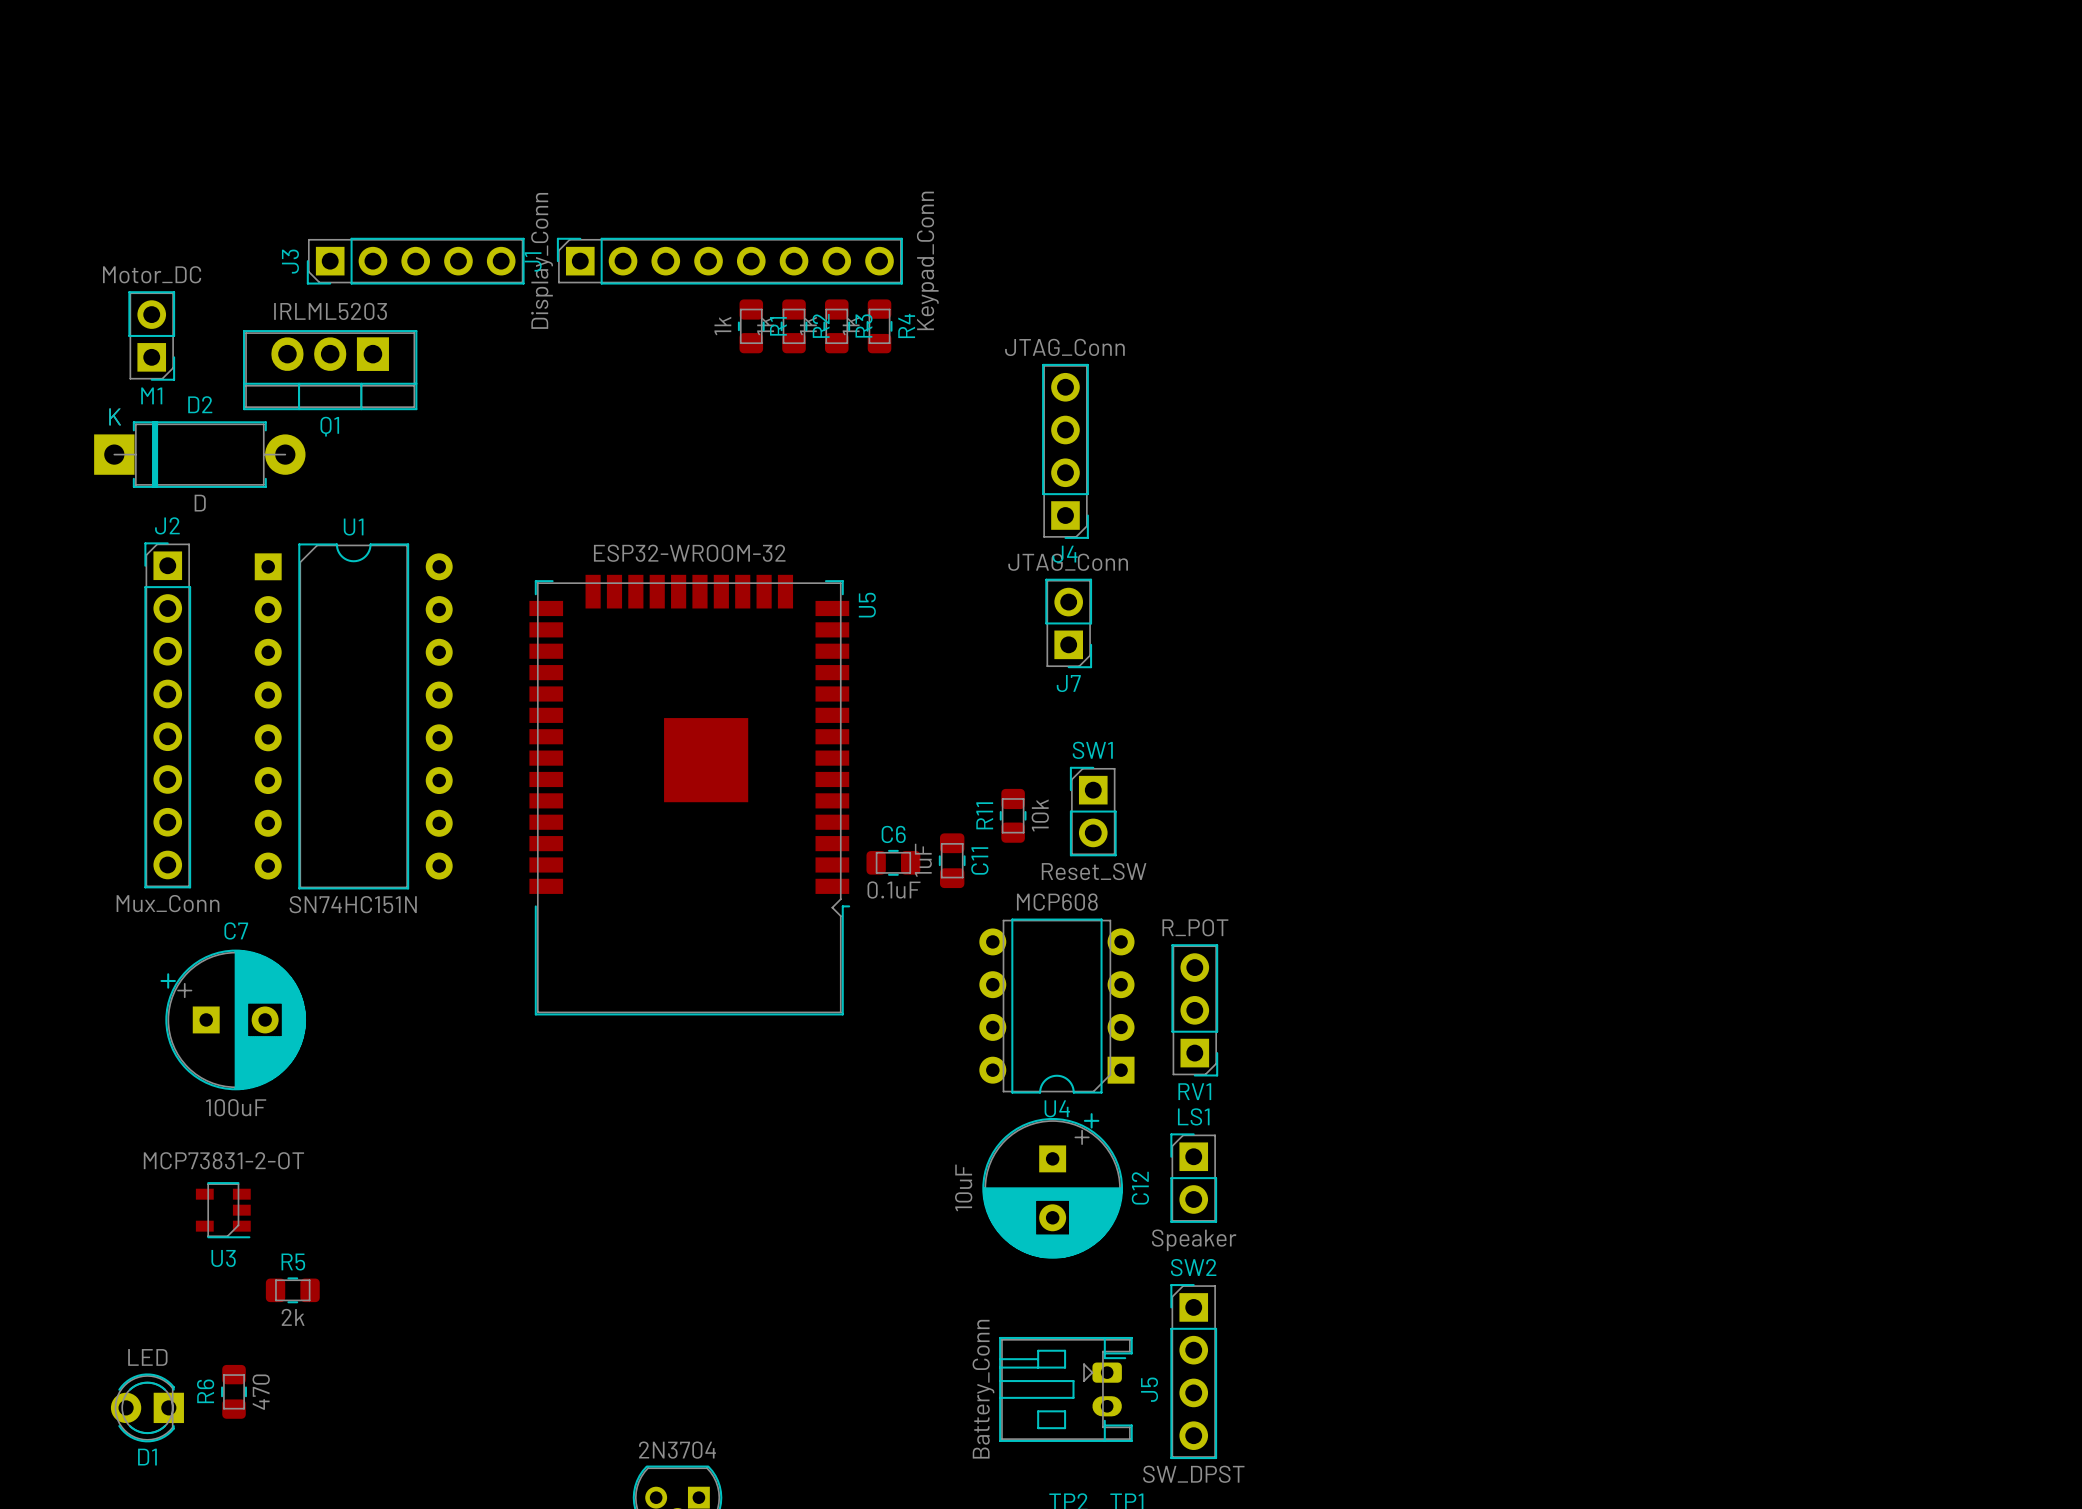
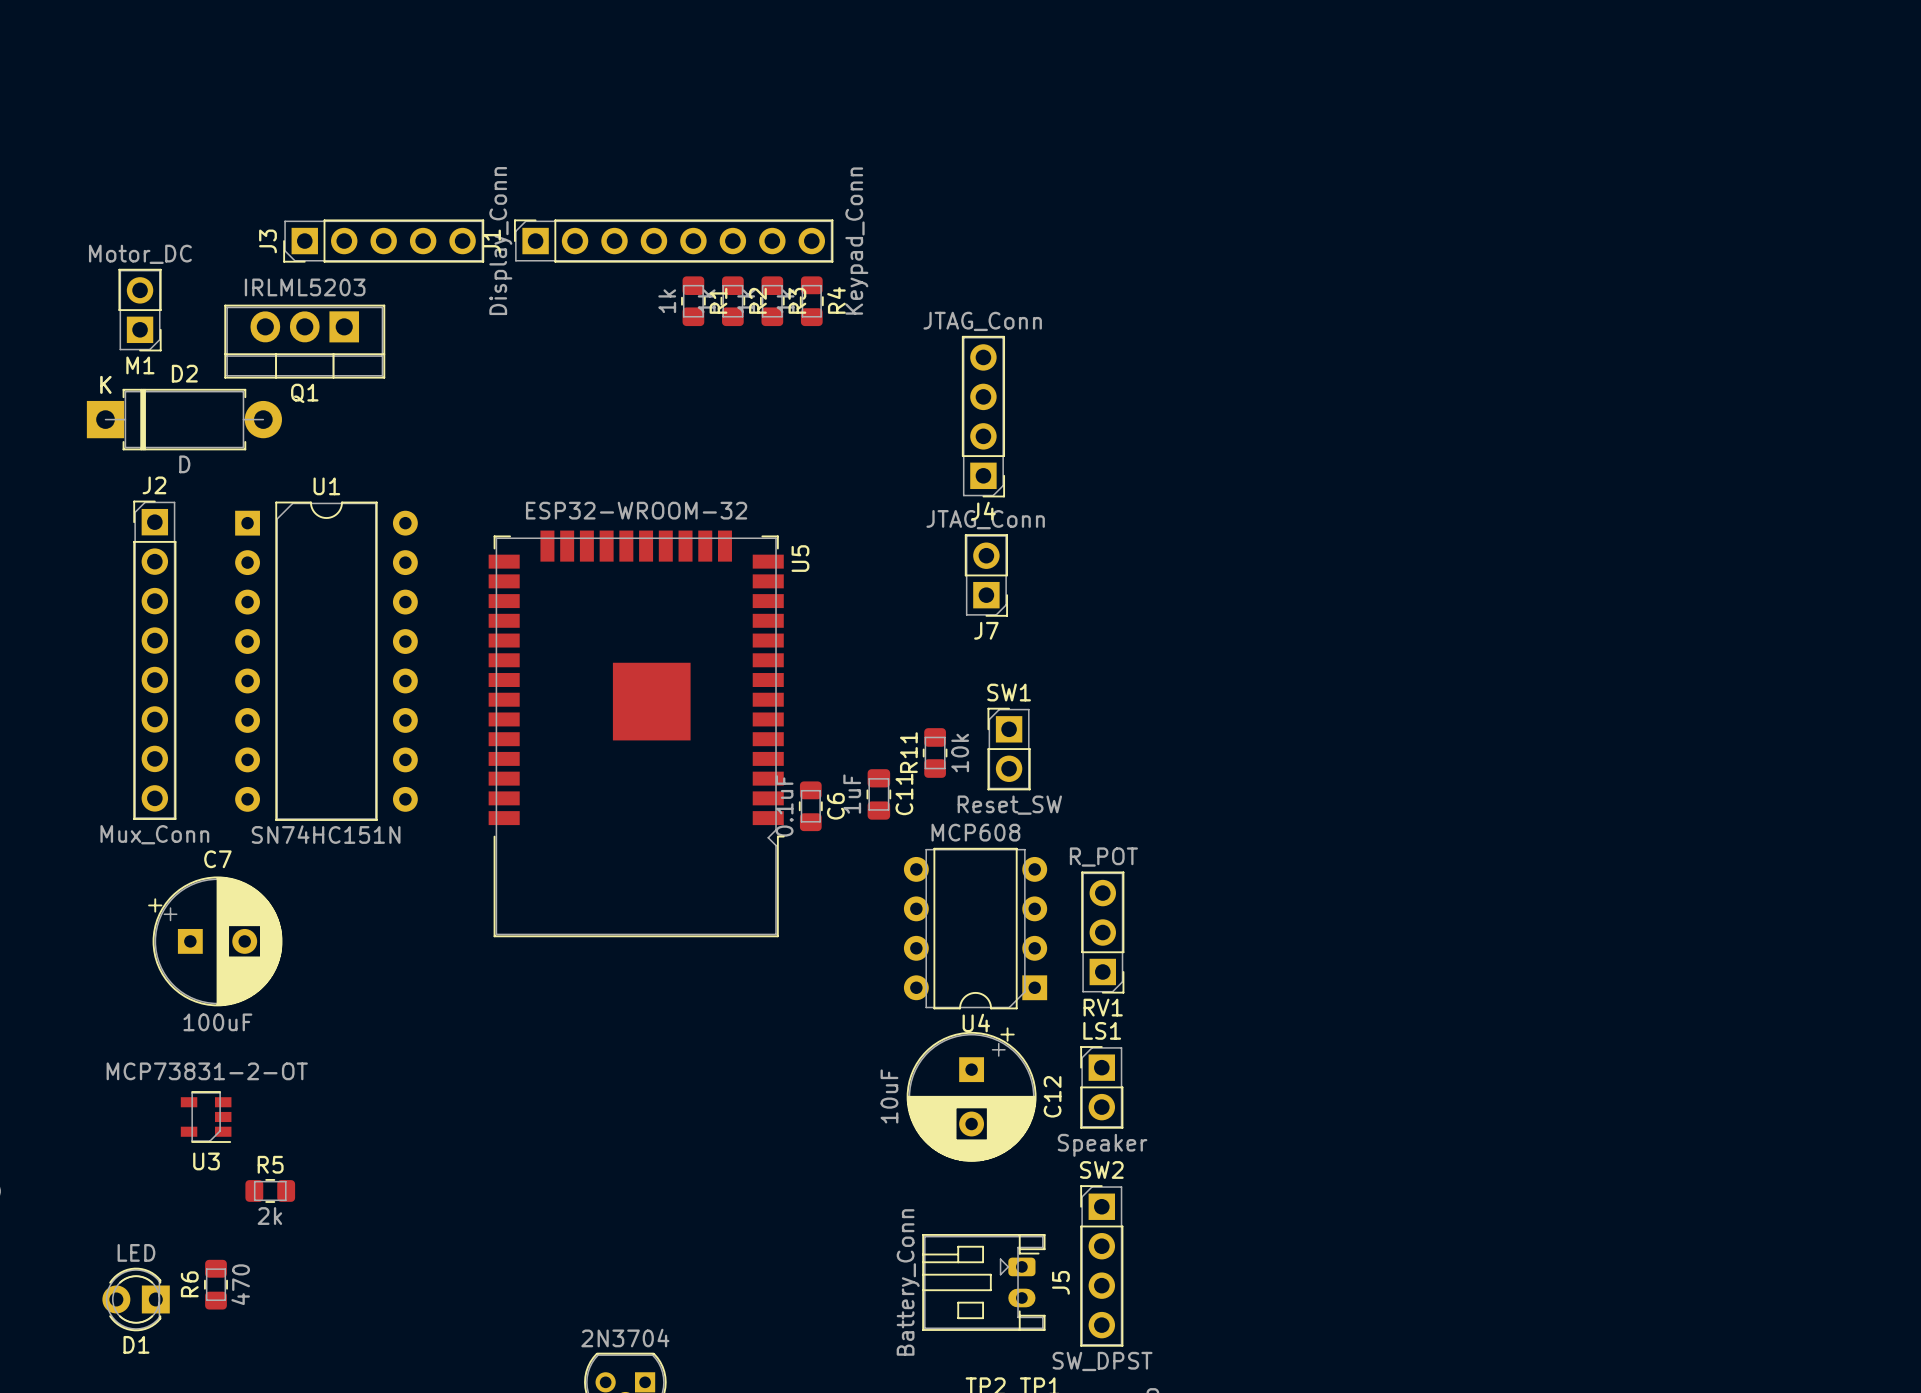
C6 rotation: 0° (893, 862) -> 90° clockwise (810, 806)

